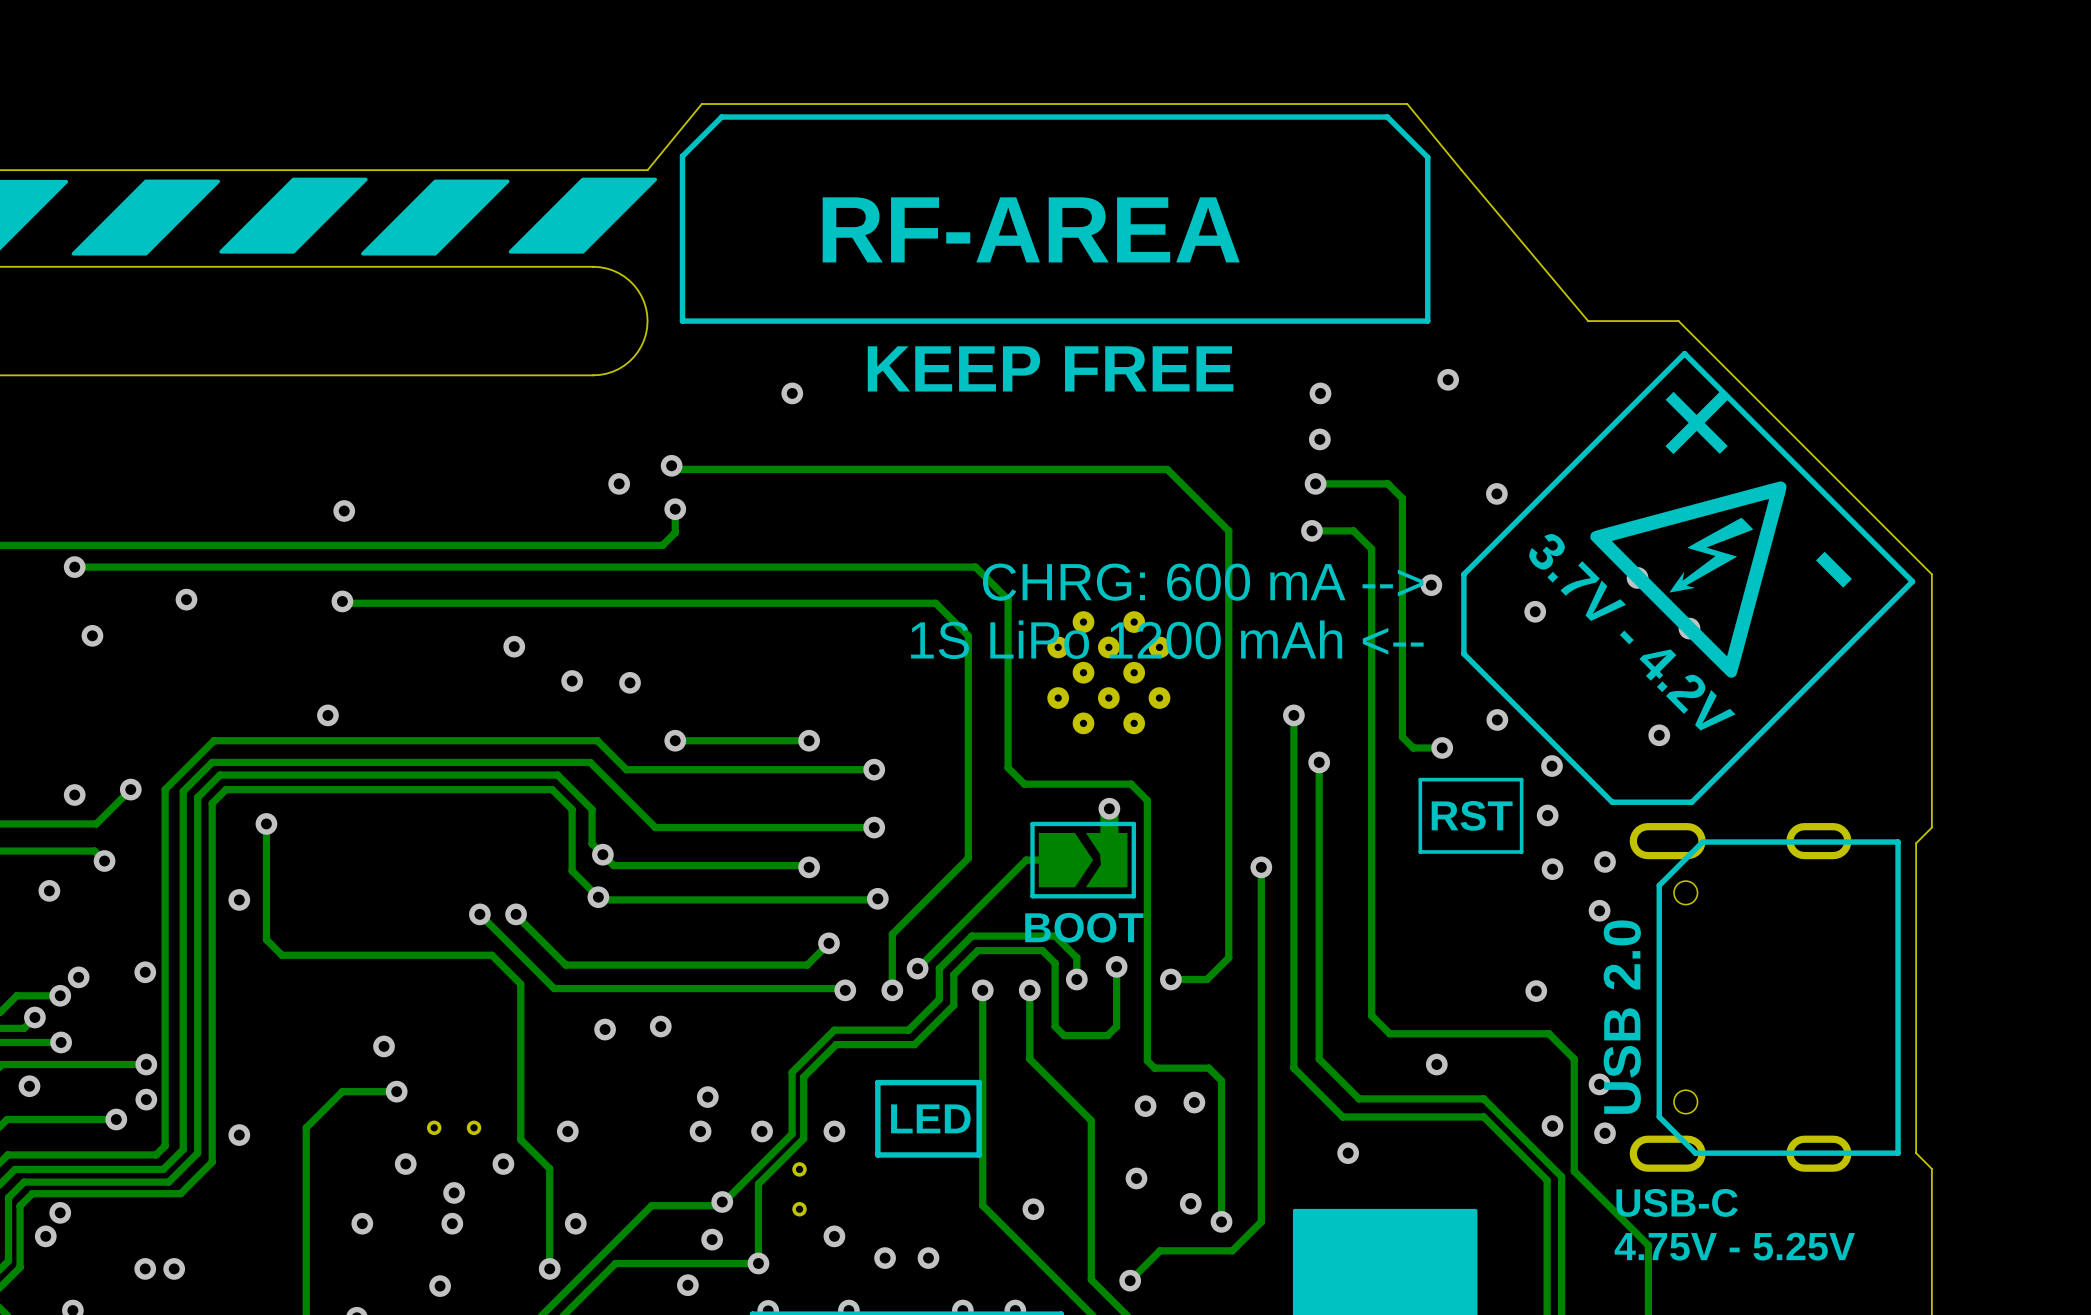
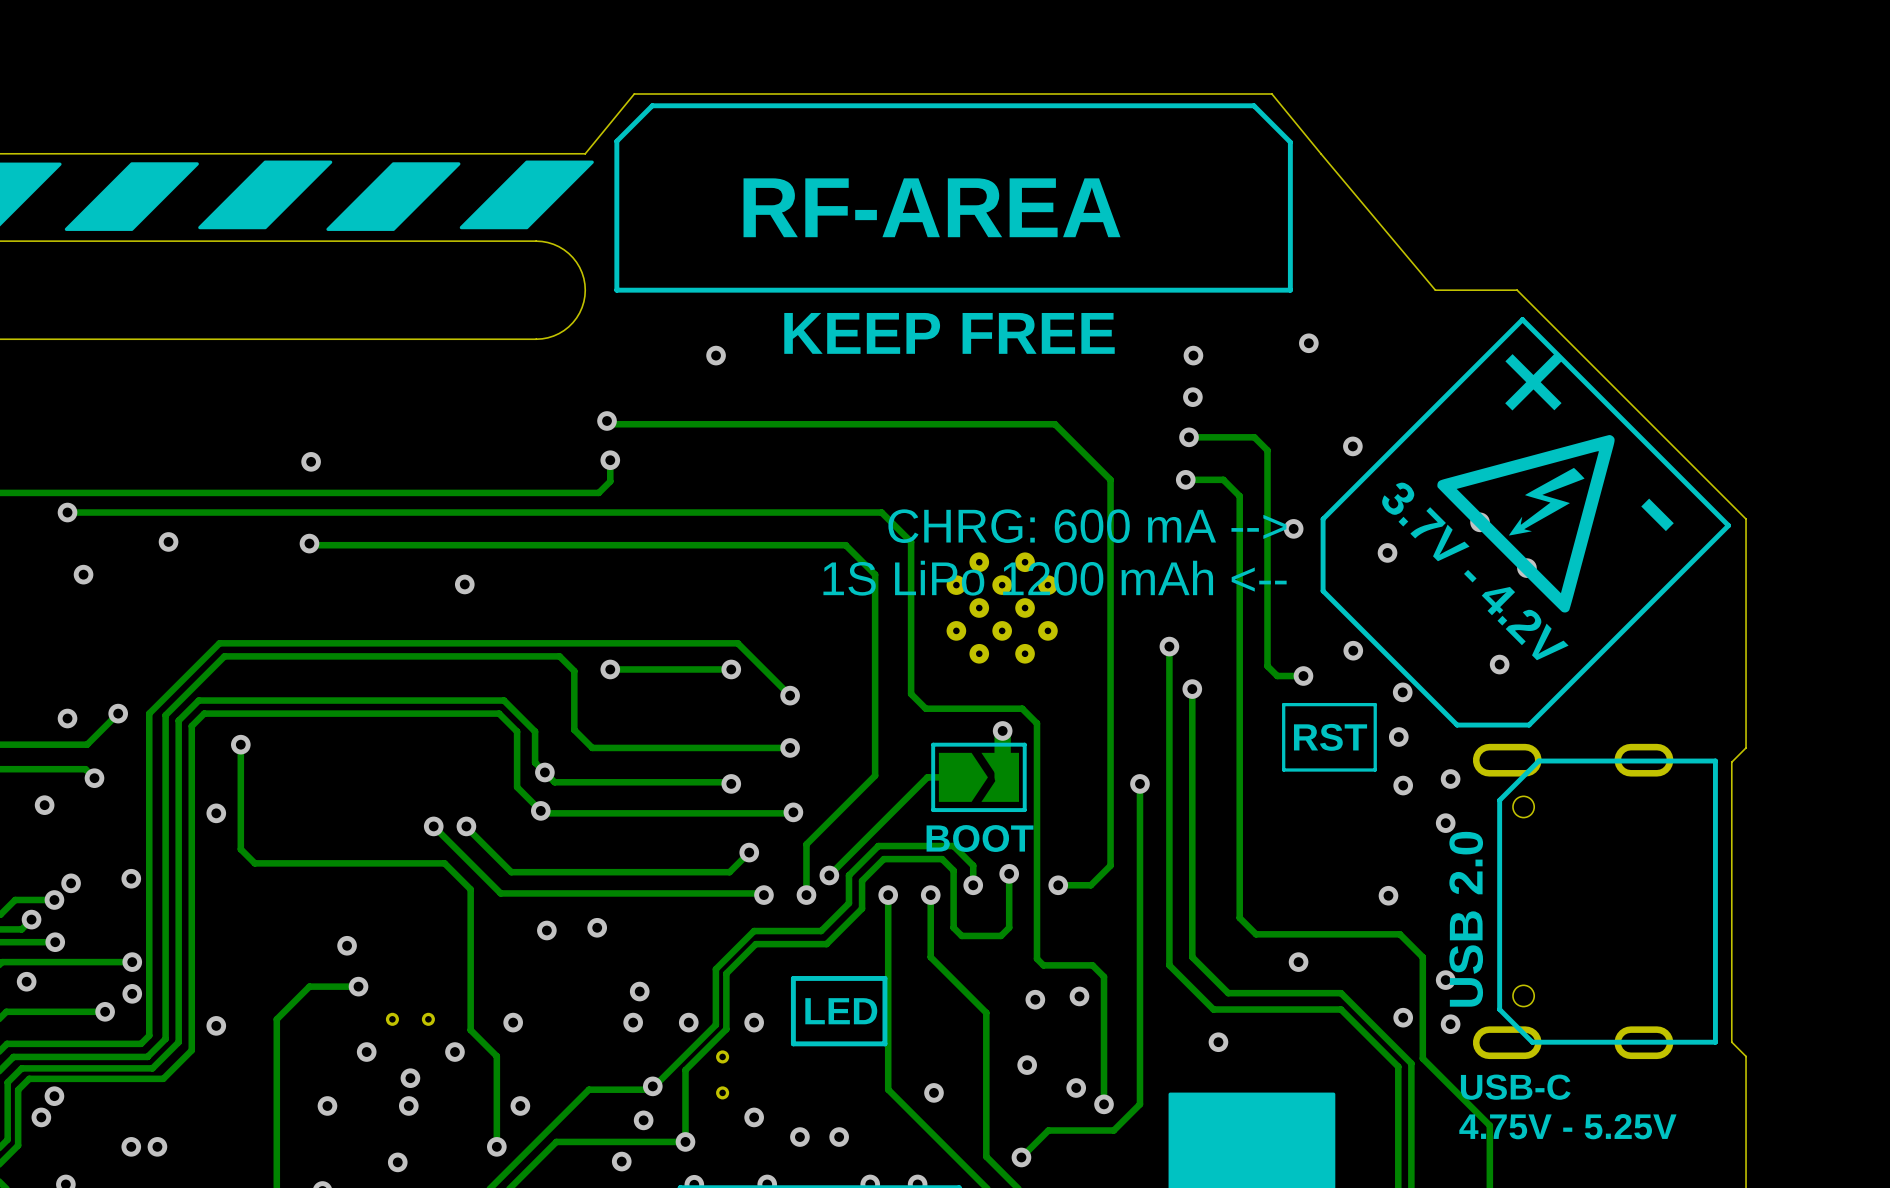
via: (619, 483) -> none
via: (572, 681) -> none
via: (630, 682) -> none
via: (327, 715) -> none
track: (213, 740) (597, 740) (626, 769) (874, 769) -> (193, 669) (219, 643) (737, 643) (790, 695)
track: (212, 762) (590, 762) (635, 807) -> (191, 689) (224, 656) (559, 656) (574, 671) (574, 729)

